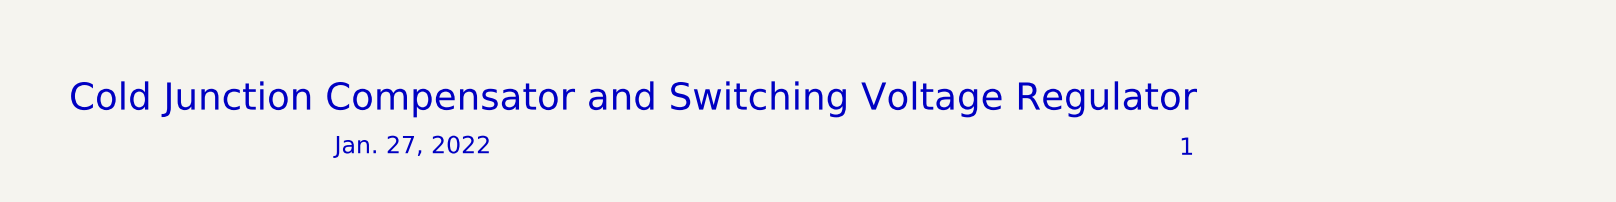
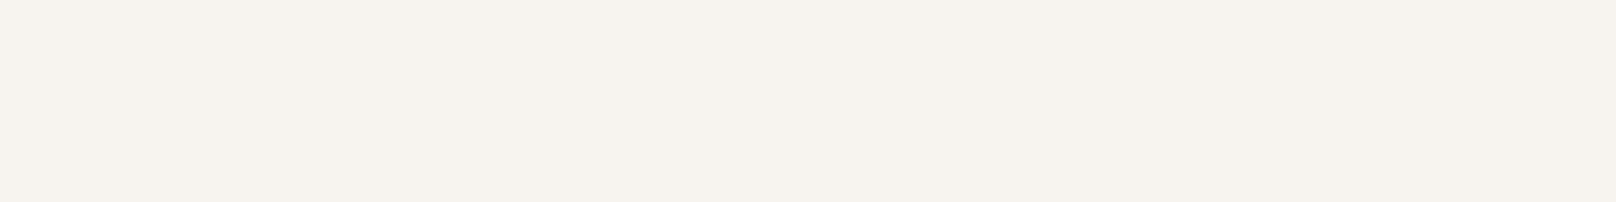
text: Cold Junction Compensator and Switching Voltage Regulator (634, 99) -> none
text: Jan. 27, 2022 (411, 146) -> none
text: 1 (1186, 146) -> none

